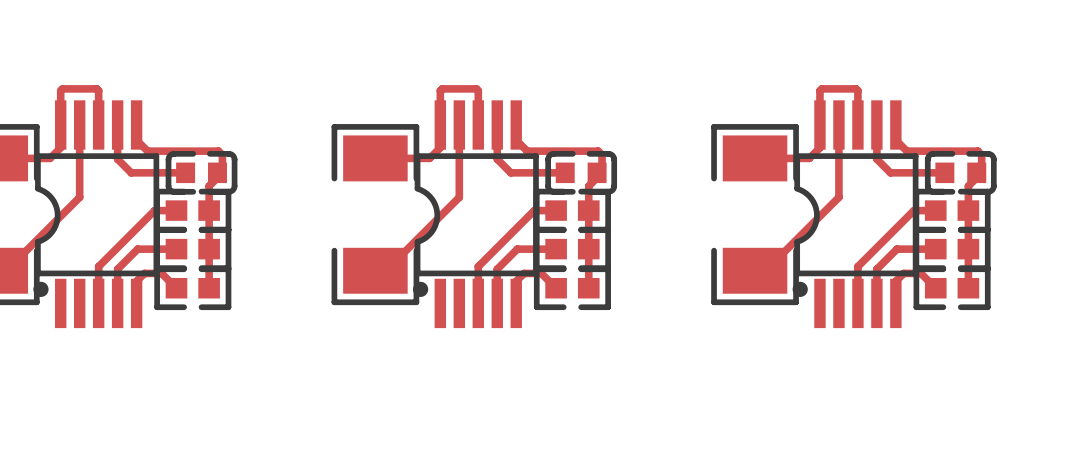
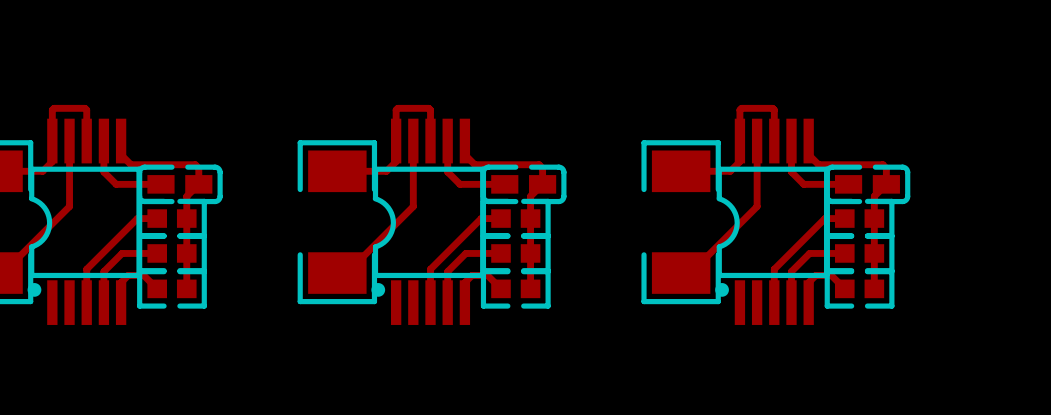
part footprint: [165, 150, 238, 195] -> [137, 164, 223, 205]
part footprint: [545, 150, 618, 195] -> [480, 164, 567, 205]
part footprint: [924, 150, 997, 195] -> [824, 164, 911, 205]

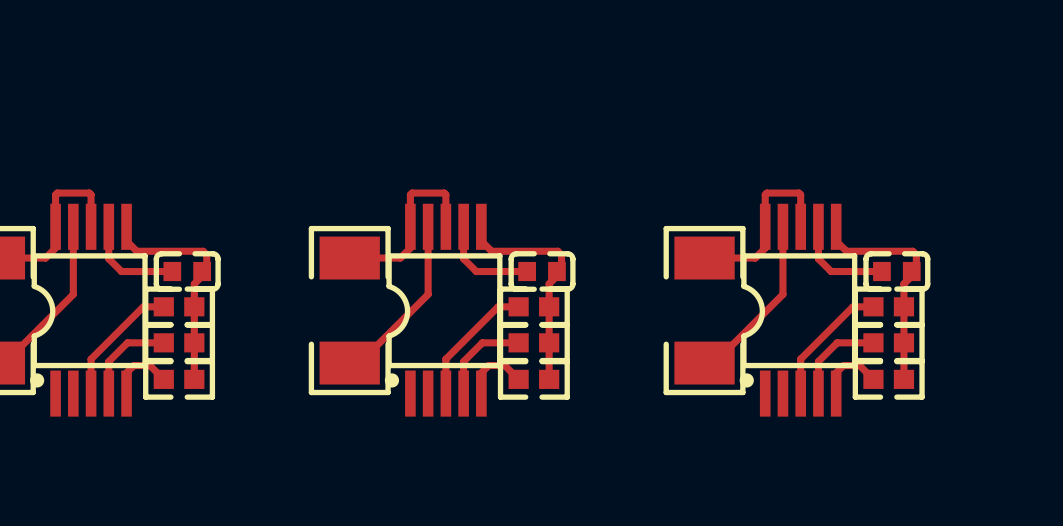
part footprint: [137, 164, 223, 205] -> [153, 251, 221, 292]
part footprint: [480, 164, 567, 205] -> [508, 251, 576, 292]
part footprint: [824, 164, 911, 205] -> [863, 251, 931, 292]

